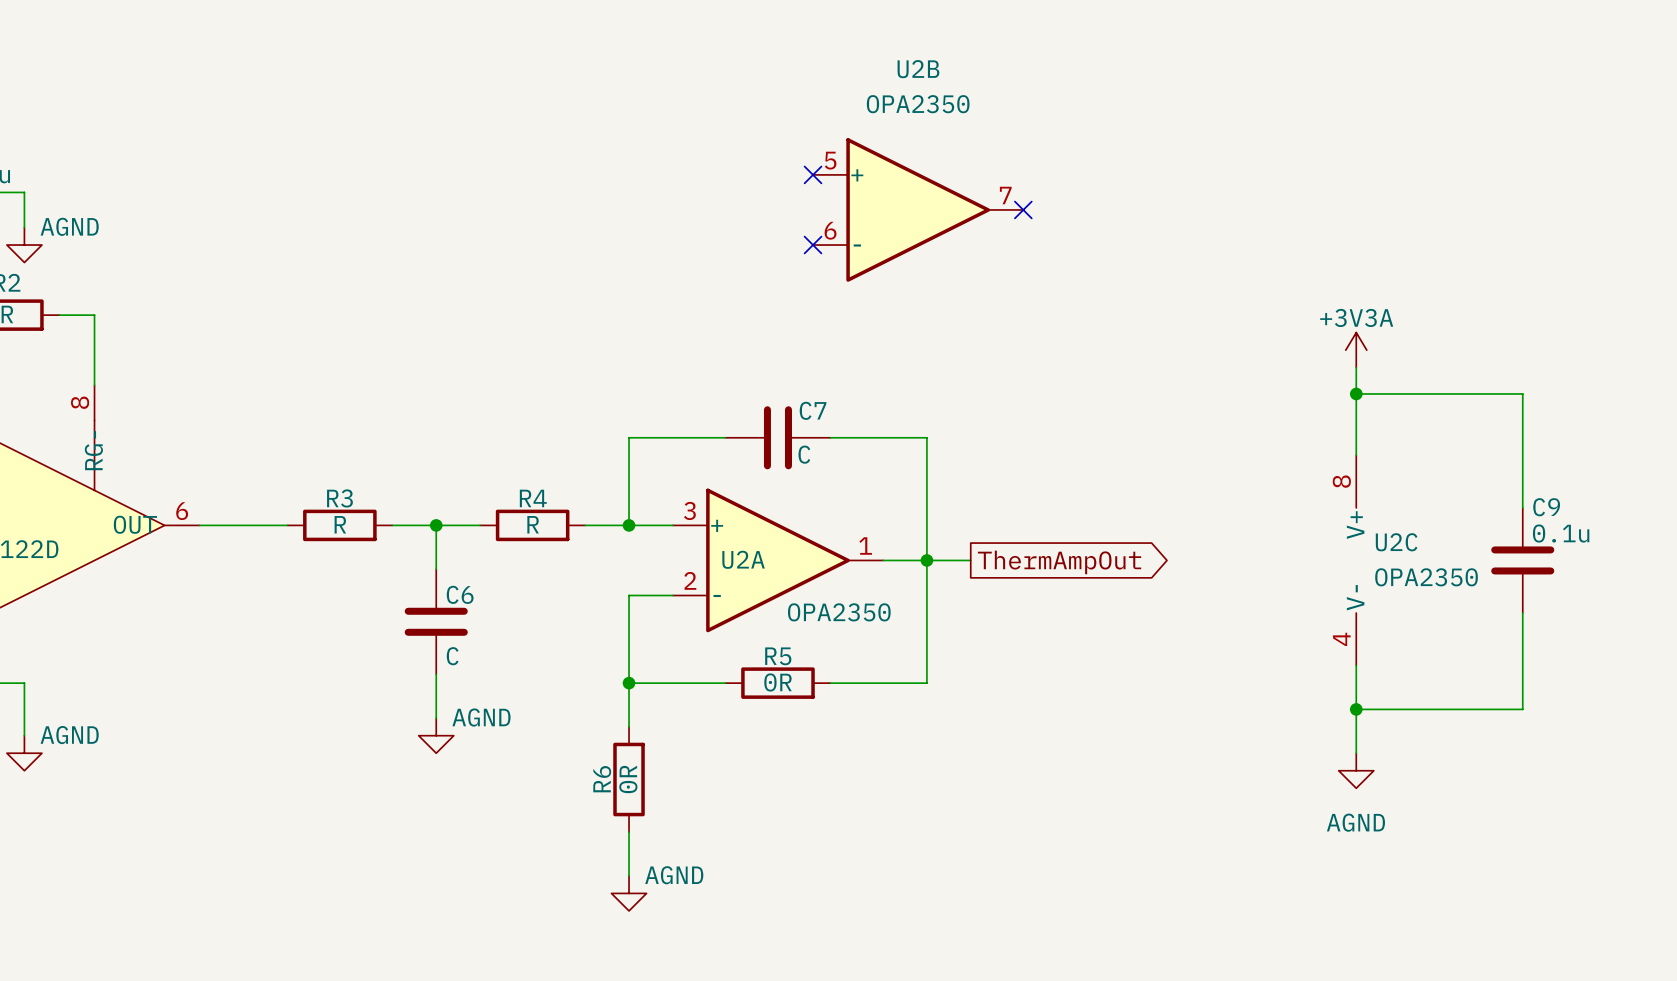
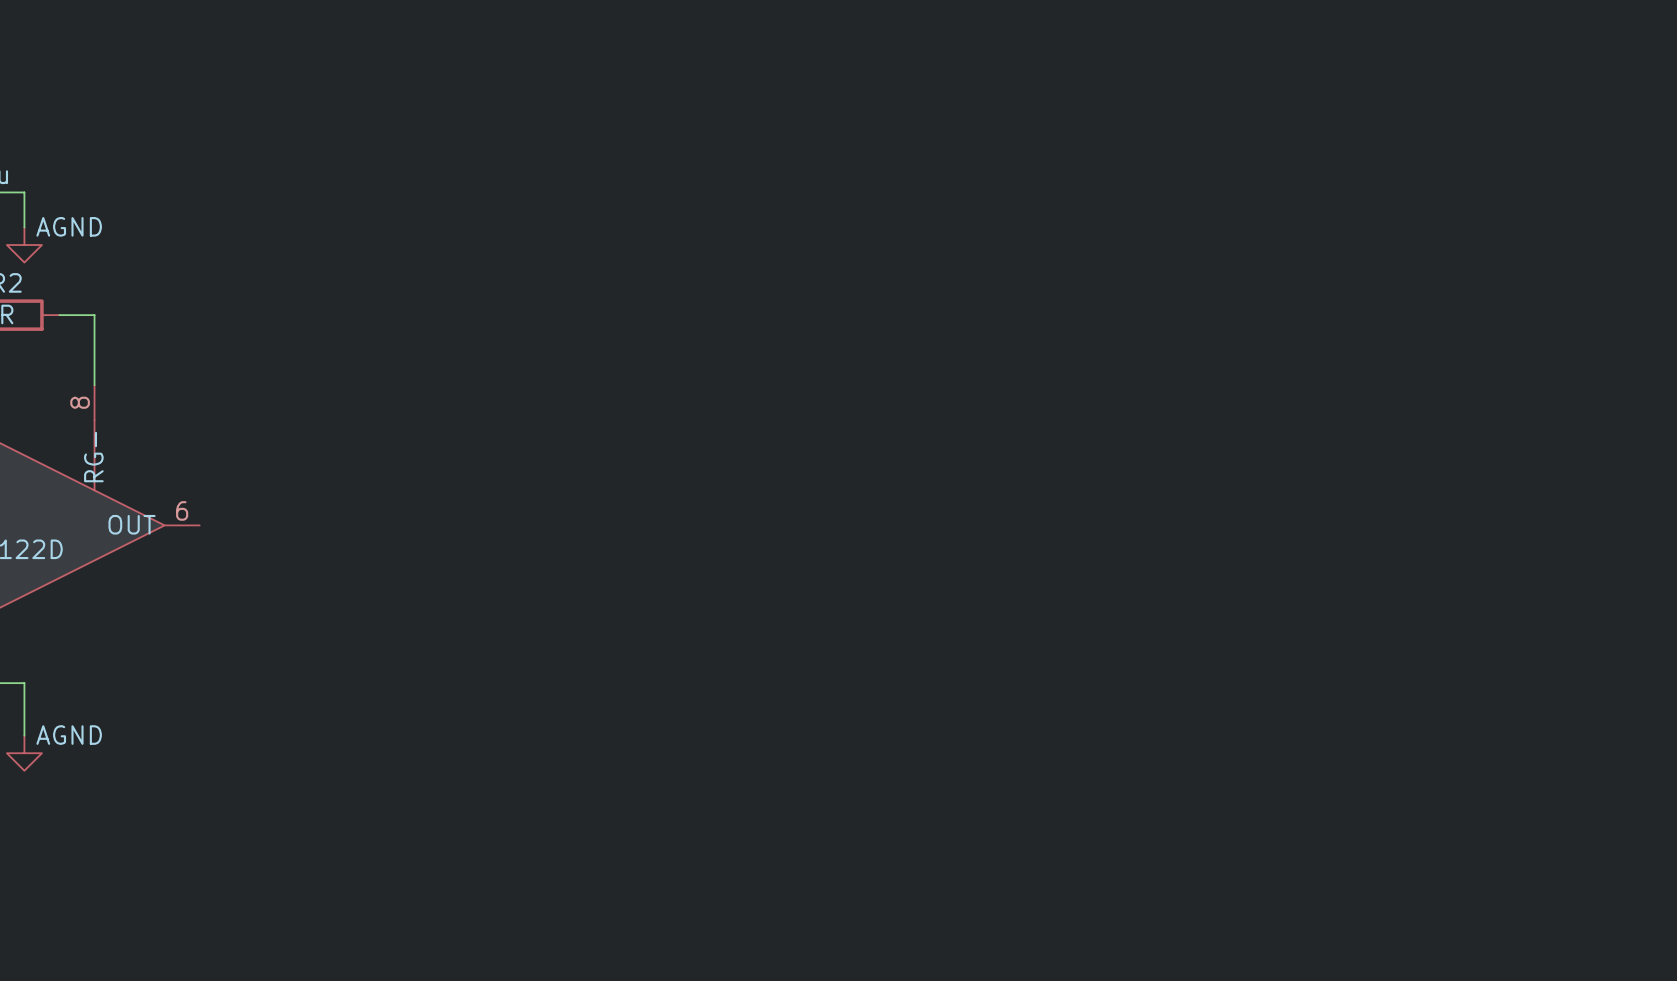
no-connect mark: (813, 174) -> none
U2B: OPA2350 (918, 209) -> none
no-connect mark: (1023, 209) -> none
no-connect mark: (813, 245) -> none
power symbol: +3V3A (1356, 350) -> none
wire: (1356, 367) (1356, 455) -> none
wire: (1356, 393) (1522, 393) (1522, 507) -> none
junction: (1356, 393) -> none
wire: (725, 437) (629, 437) (629, 525) -> none
C7: C (777, 437) -> none
wire: (830, 437) (926, 437) (926, 683) (830, 683) -> none
wire: (199, 525) (287, 525) -> none
R3: R (339, 525) -> none
wire: (392, 525) (480, 525) -> none
wire: (436, 525) (436, 569) -> none
junction: (436, 525) -> none
R4: R (532, 525) -> none
wire: (585, 525) (672, 525) -> none
junction: (629, 525) -> none
U2A: OPA2350 (777, 560) -> none
wire: (883, 560) (970, 560) -> none
junction: (926, 560) -> none
U2C: OPA2350 (1356, 560) -> none
C9: 0.1u (1522, 560) -> none
global label: ThermAmpOut (1059, 562) -> none
wire: (672, 595) (629, 595) (629, 726) -> none
wire: (1522, 613) (1522, 709) (1356, 709) -> none
C6: C (436, 621) -> none
wire: (1356, 665) (1356, 753) -> none
wire: (436, 674) (436, 718) -> none
wire: (629, 683) (725, 683) -> none
junction: (629, 683) -> none
R5: 0R (777, 683) -> none
junction: (1356, 709) -> none
power symbol: AGND (436, 735) -> none
power symbol: AGND (1356, 770) -> none
R6: 0R (629, 779) -> none
wire: (629, 832) (629, 875) -> none
power symbol: AGND (629, 893) -> none

